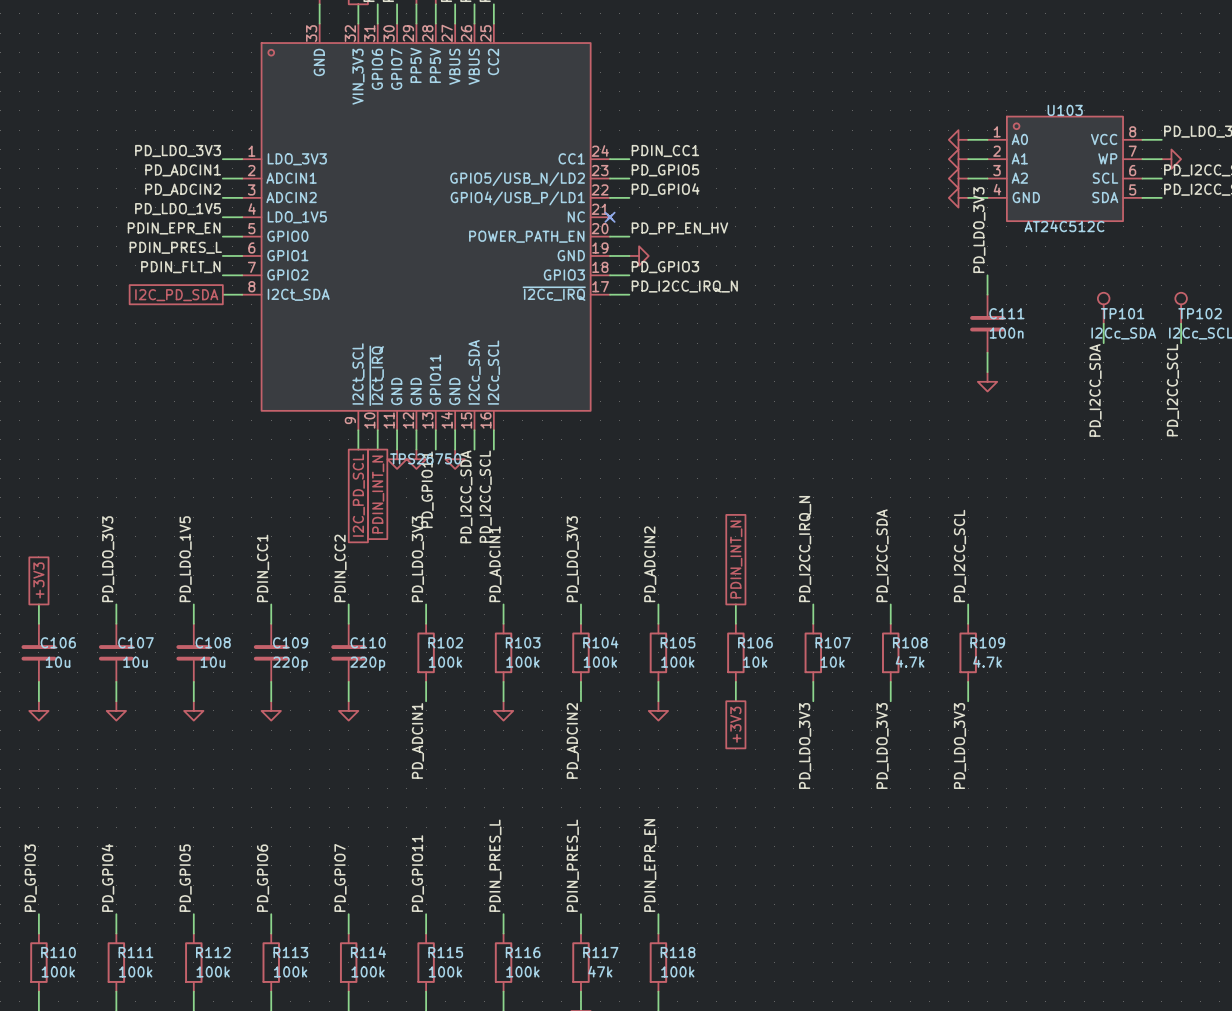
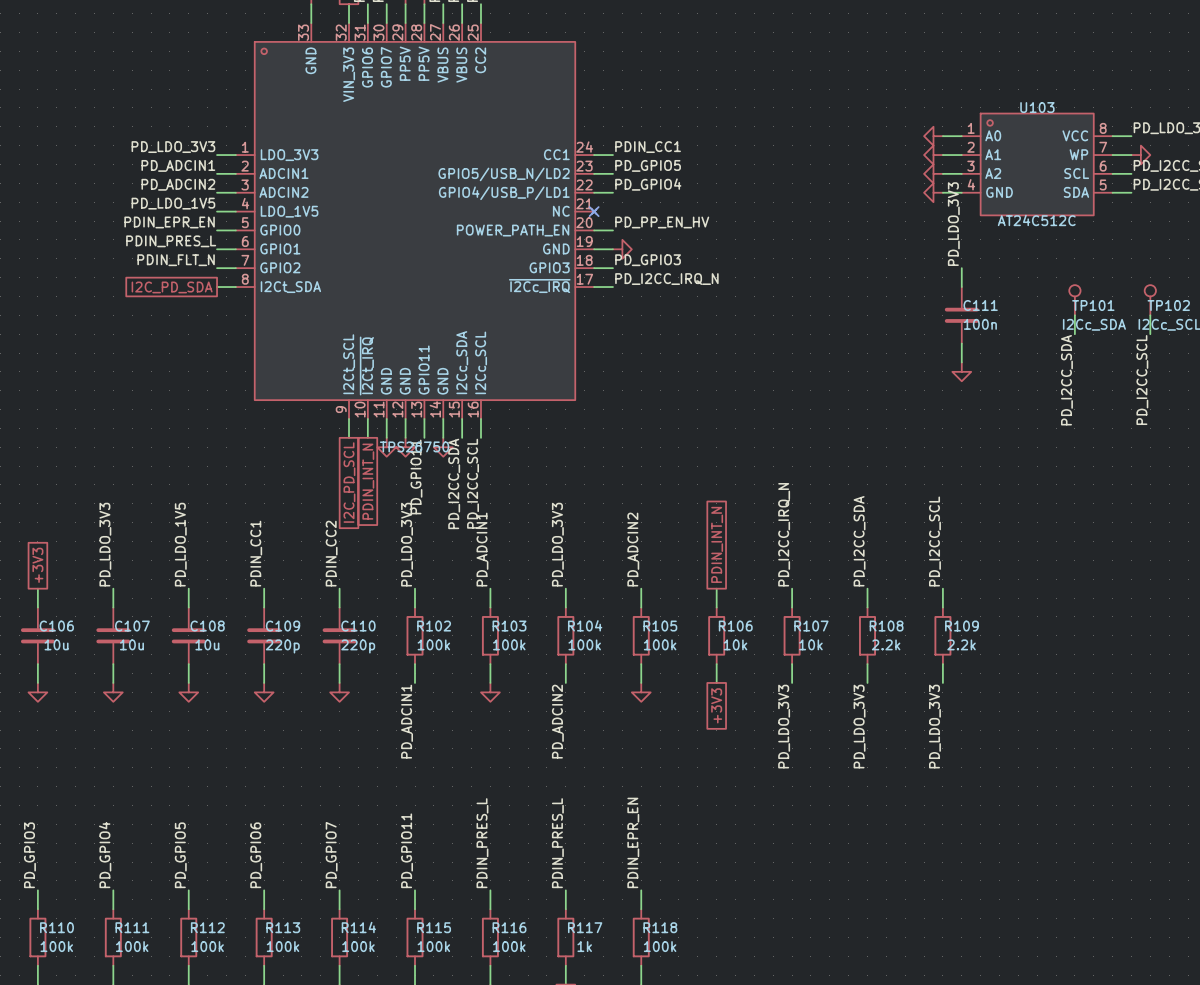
R108 value: 4.7k (910, 661) -> 2.2k (886, 644)
R109 value: 4.7k (987, 661) -> 2.2k (961, 644)
R117 value: 47k (600, 971) -> 1k (584, 946)

